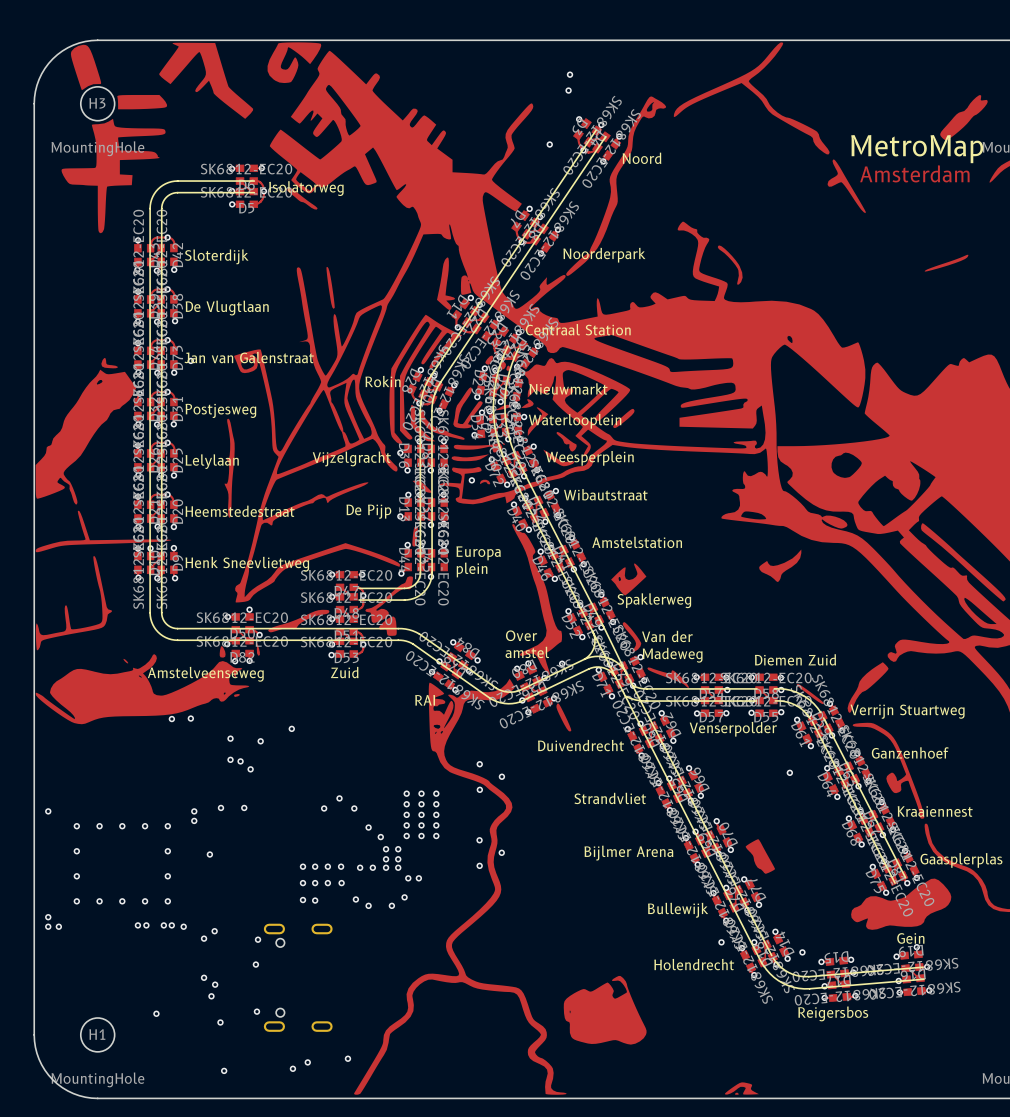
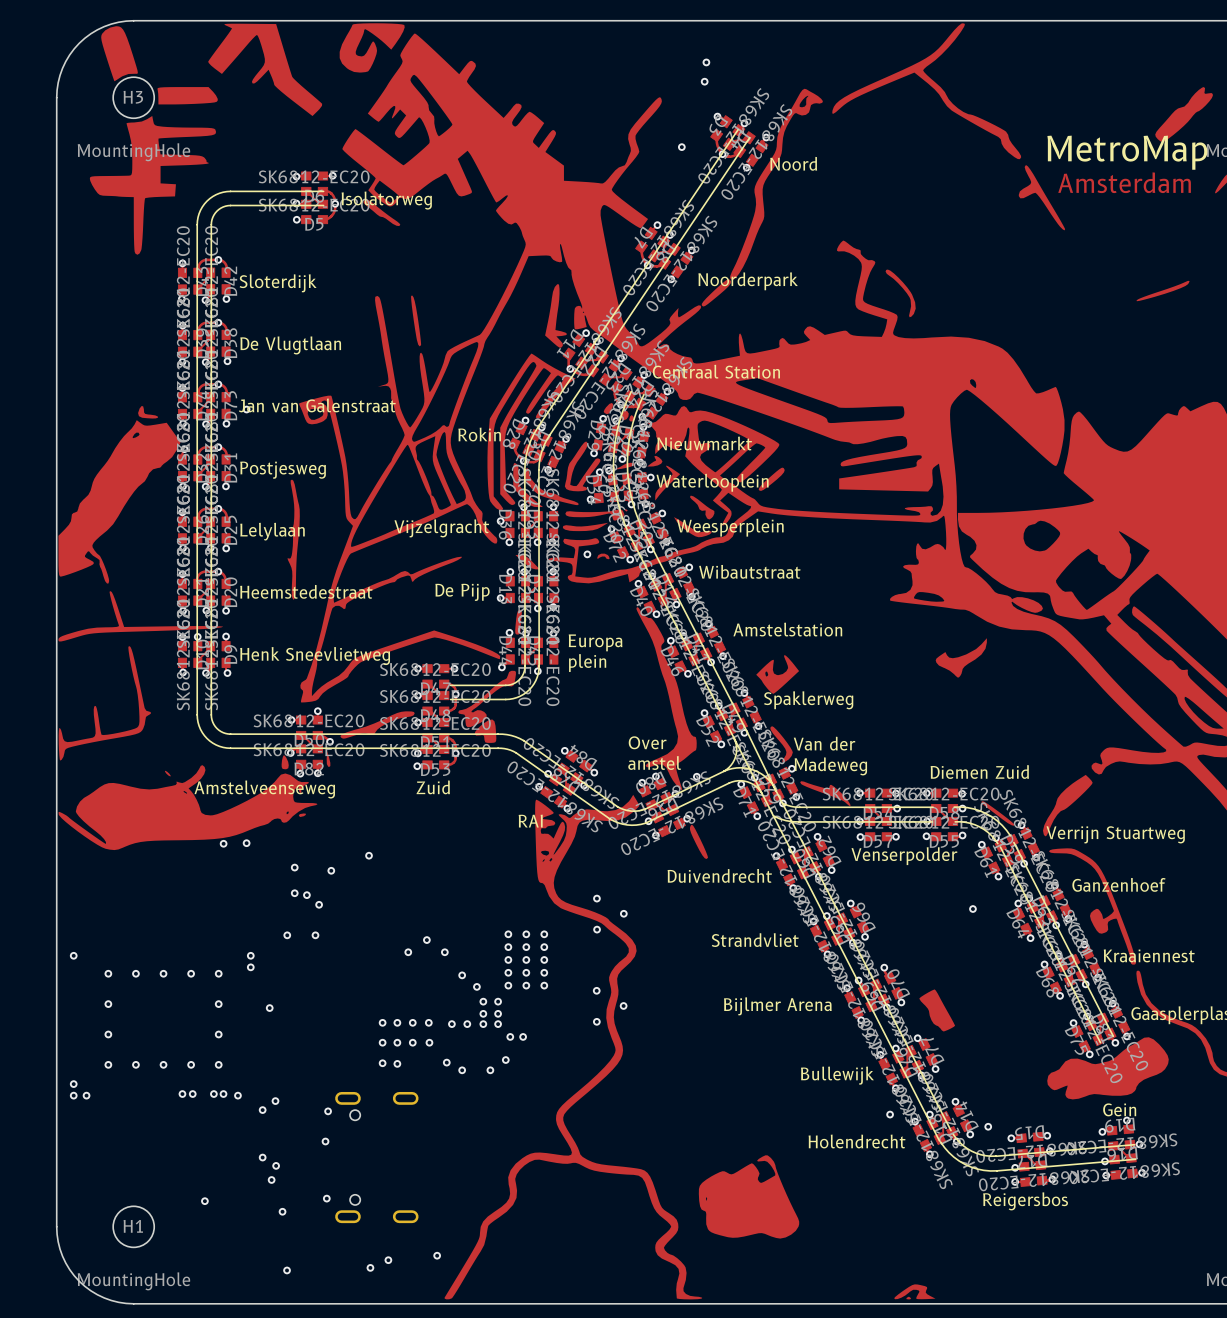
via: none -> (287, 935)
via: none -> (315, 935)
via: (220, 807) -> none
via: (244, 807) -> none

